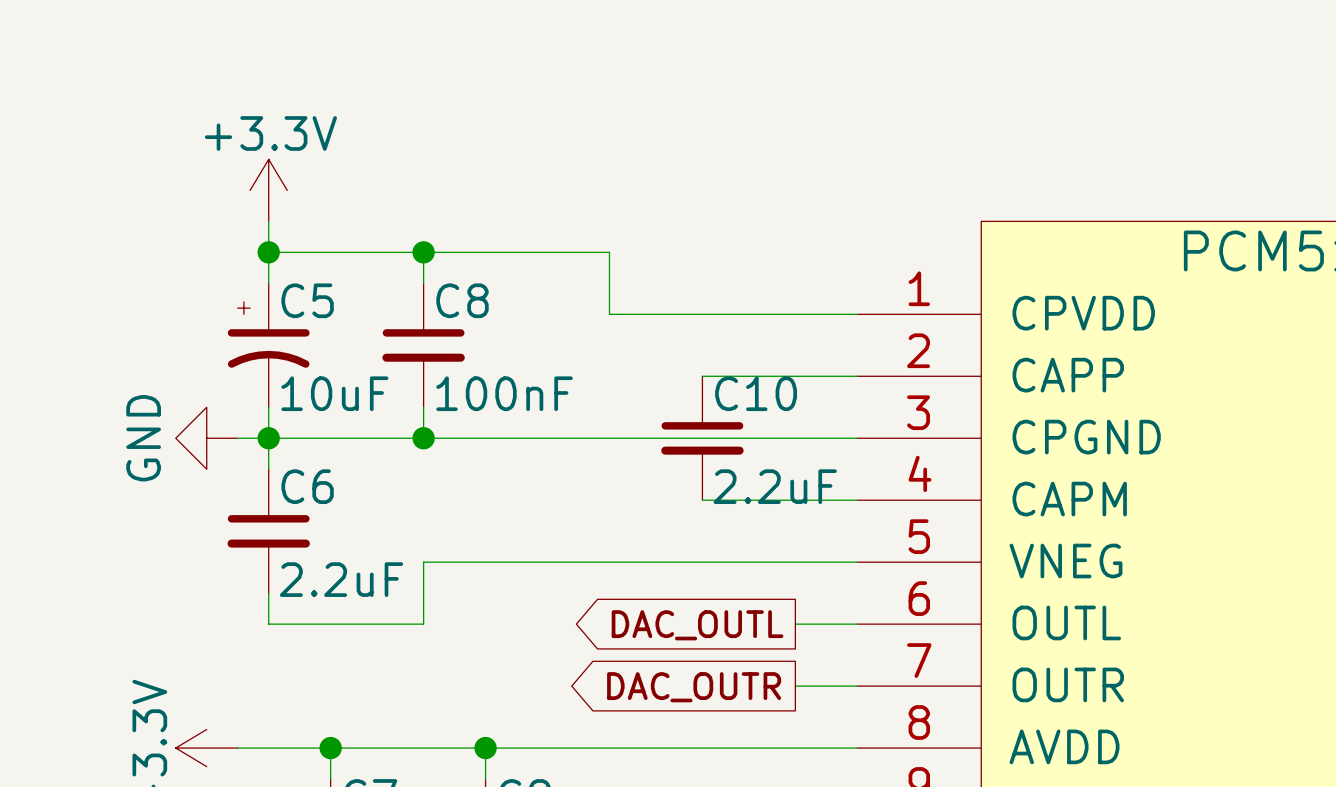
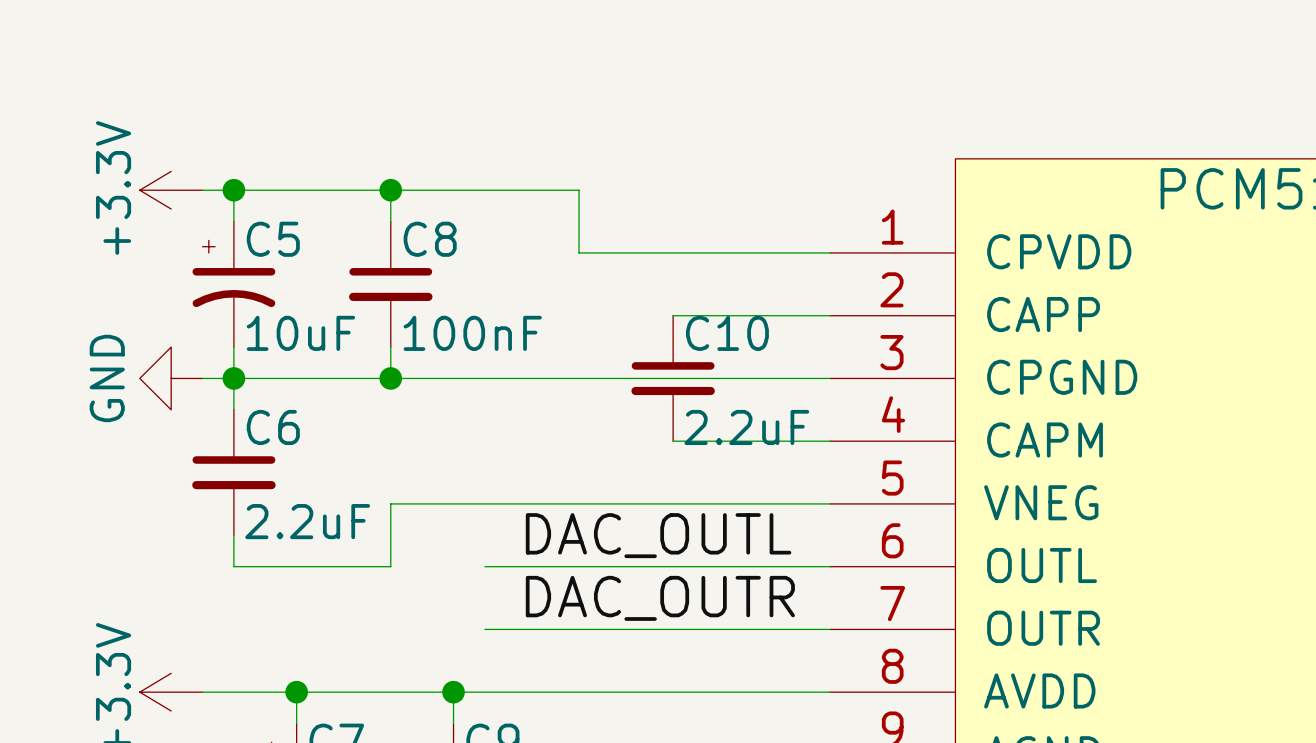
power symbol rotation: 0° (268, 190) -> 90° counterclockwise (171, 190)
power symbol position: +3.3V (268, 190) -> +3.3V (171, 190)
wire: (268, 221) (268, 252) -> (202, 190) (233, 190)
label: none -> DAC_OUTL (658, 535)
wire: none -> (484, 566) (767, 566)
global label: DAC_OUTL (697, 625) -> none
label: none -> DAC_OUTR (660, 598)
wire: none -> (484, 629) (767, 629)
global label: DAC_OUTR (694, 687) -> none

